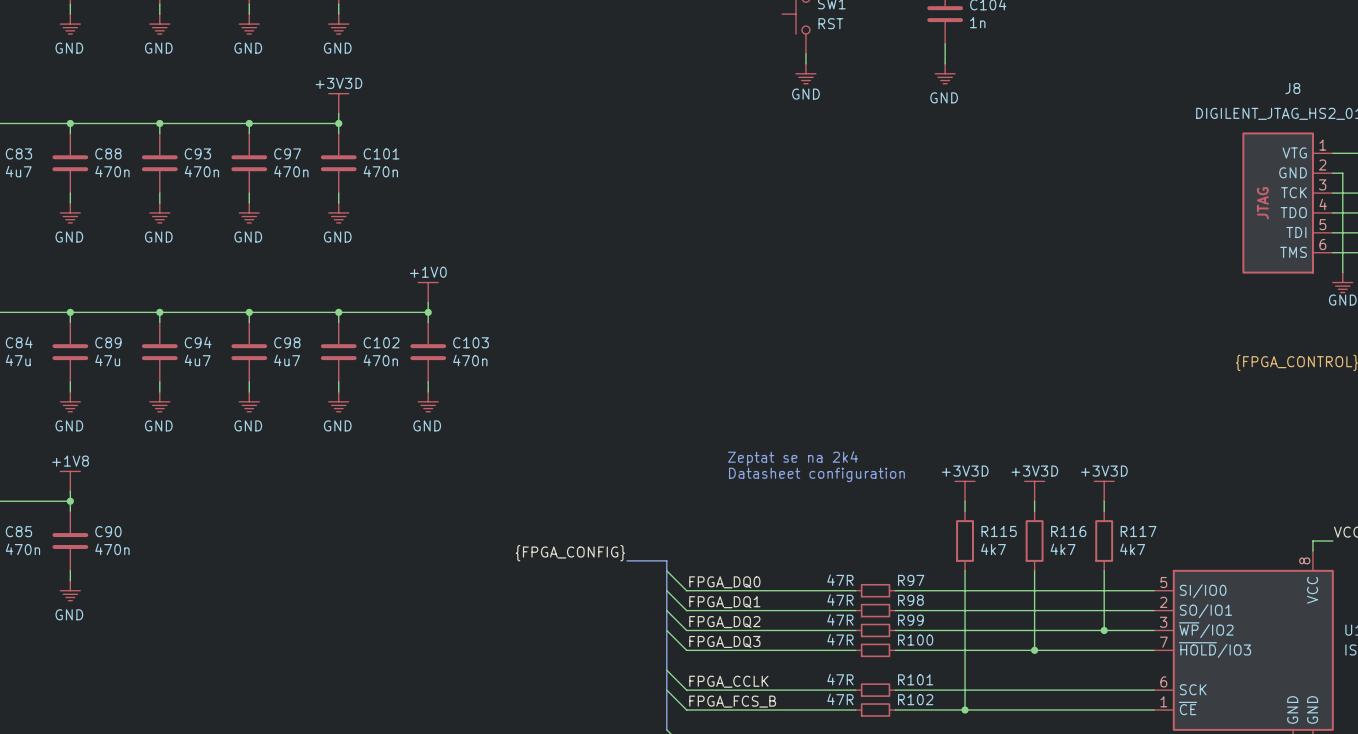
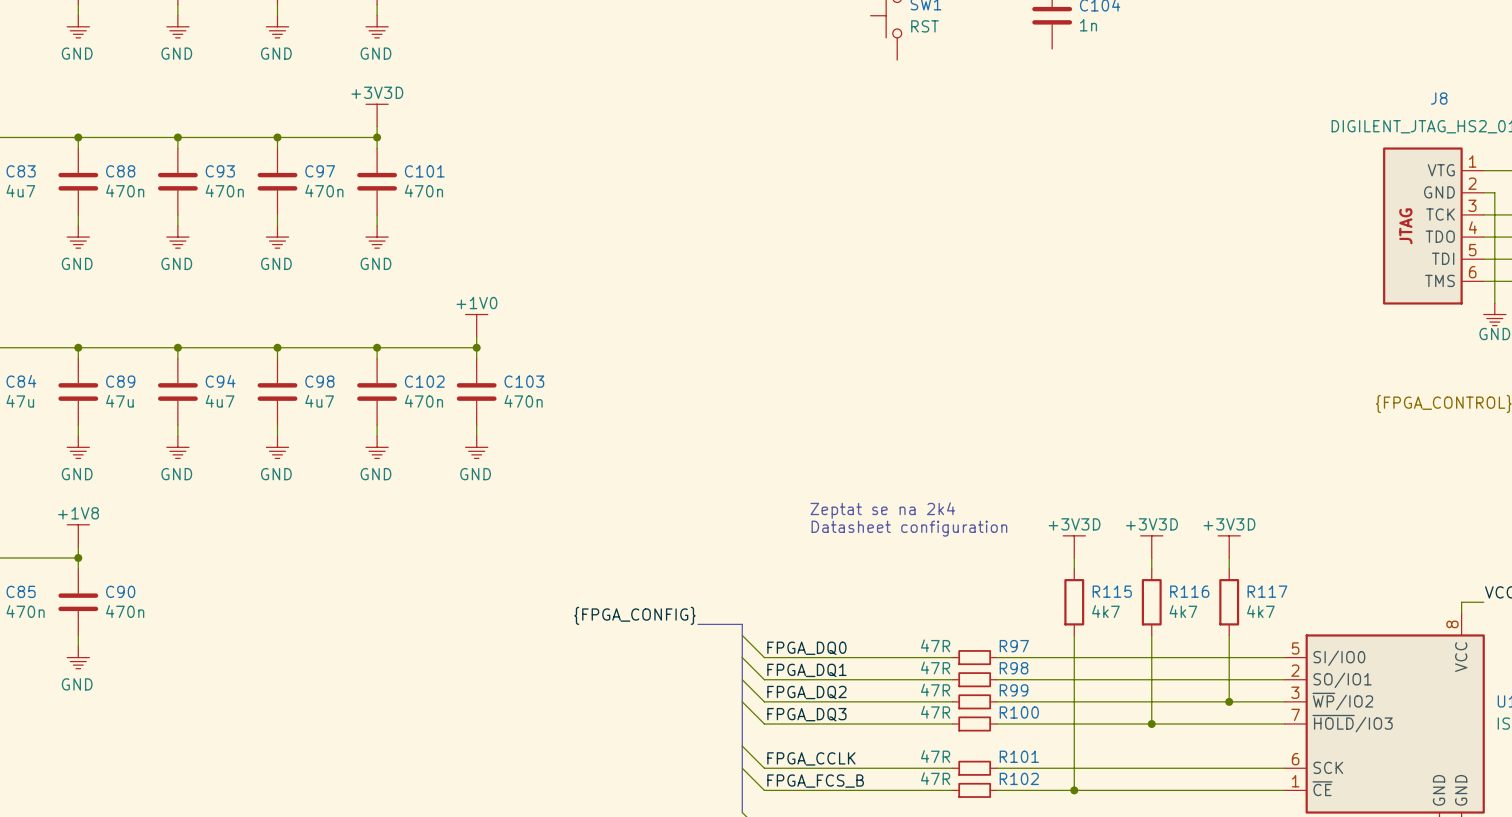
wire: (945, 43) (945, 63) -> none
wire: (805, 53) (805, 63) -> none
power symbol: GND (805, 73) -> none
power symbol: GND (945, 73) -> none

